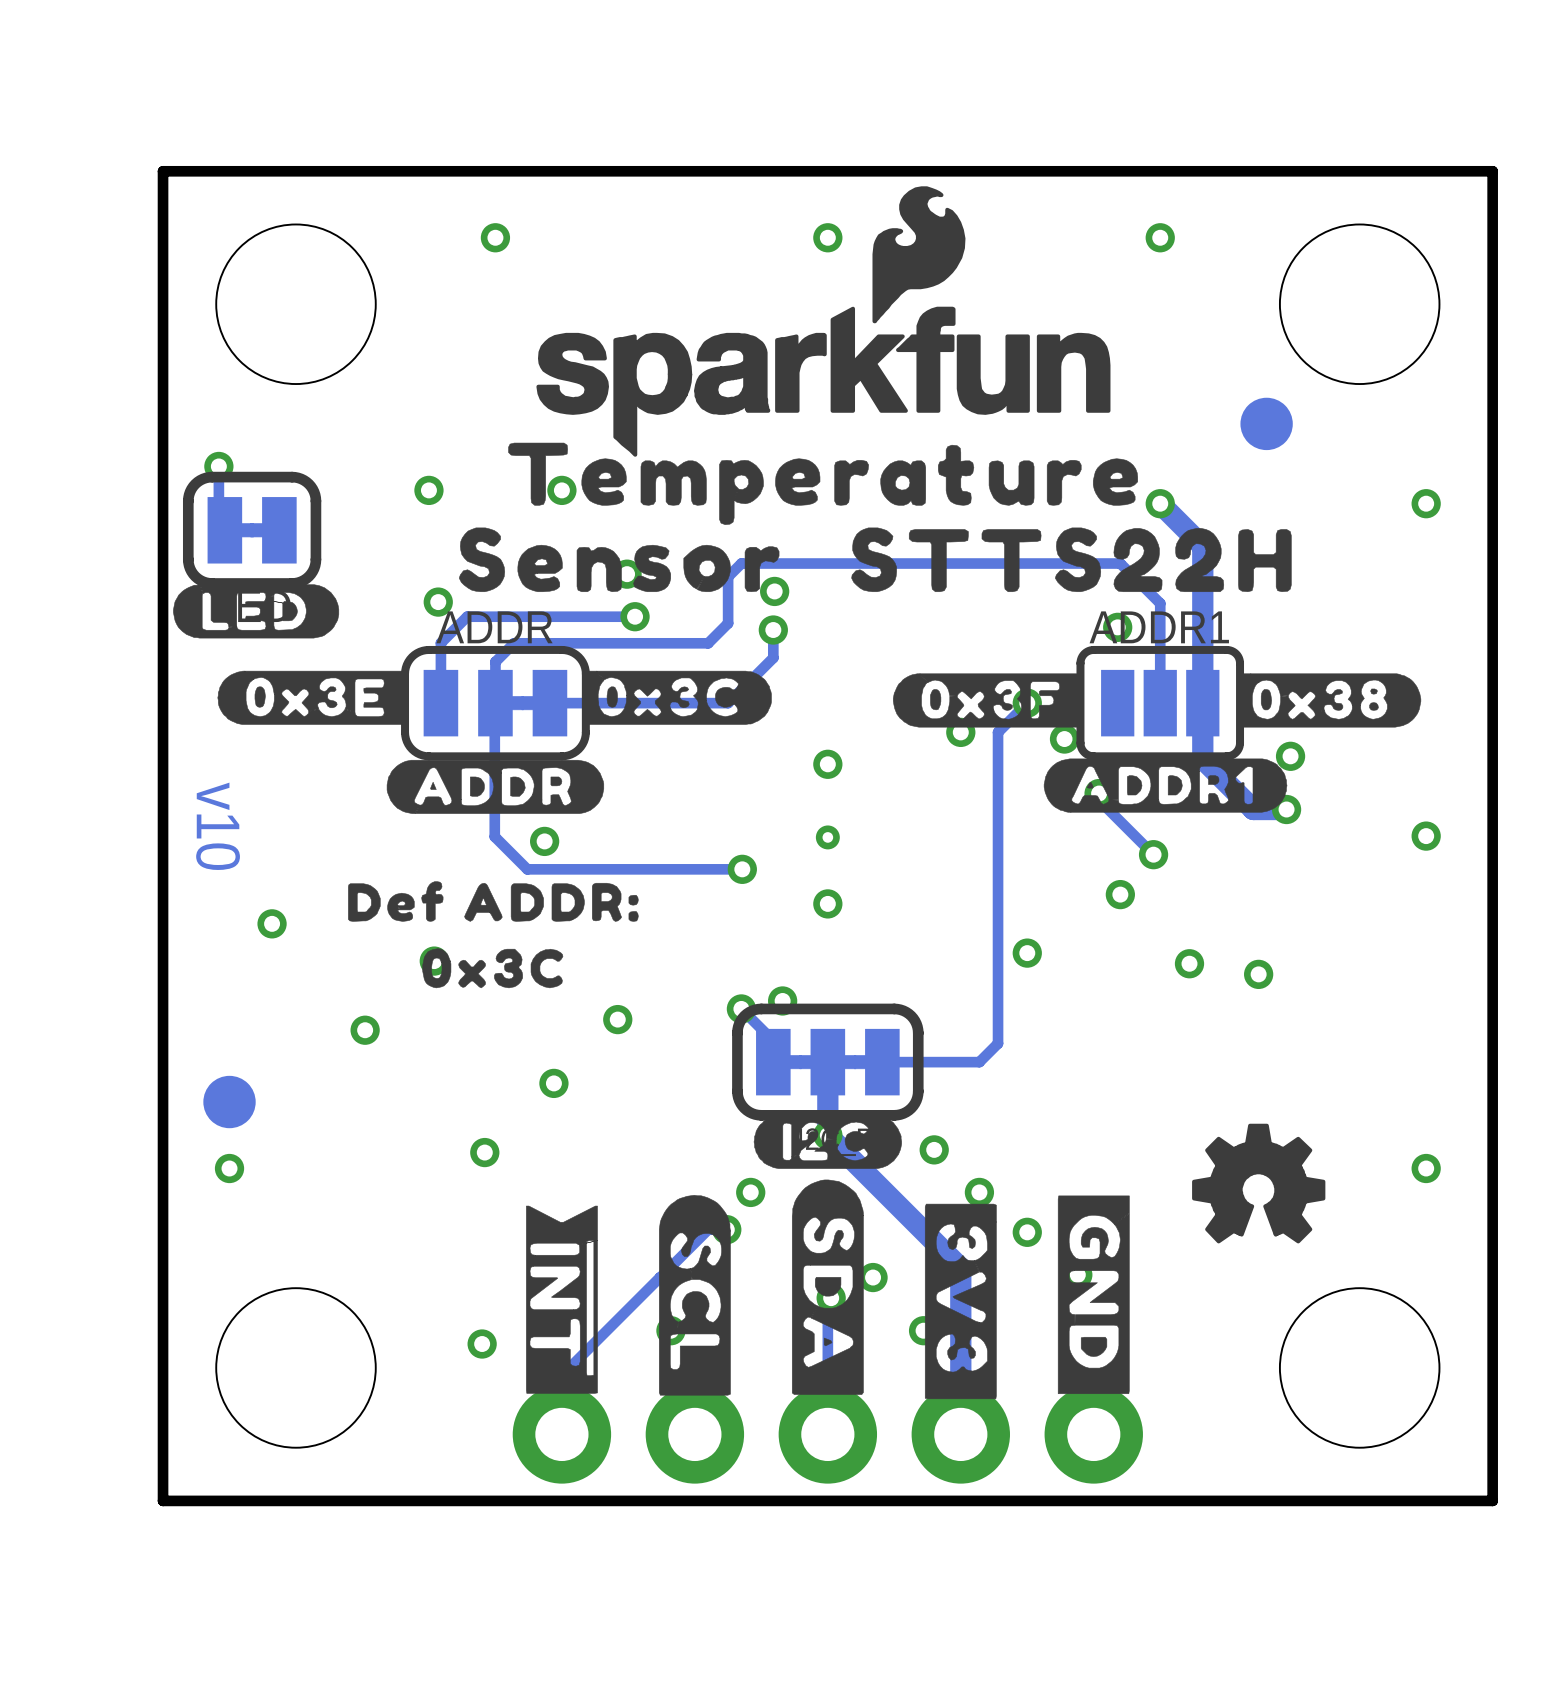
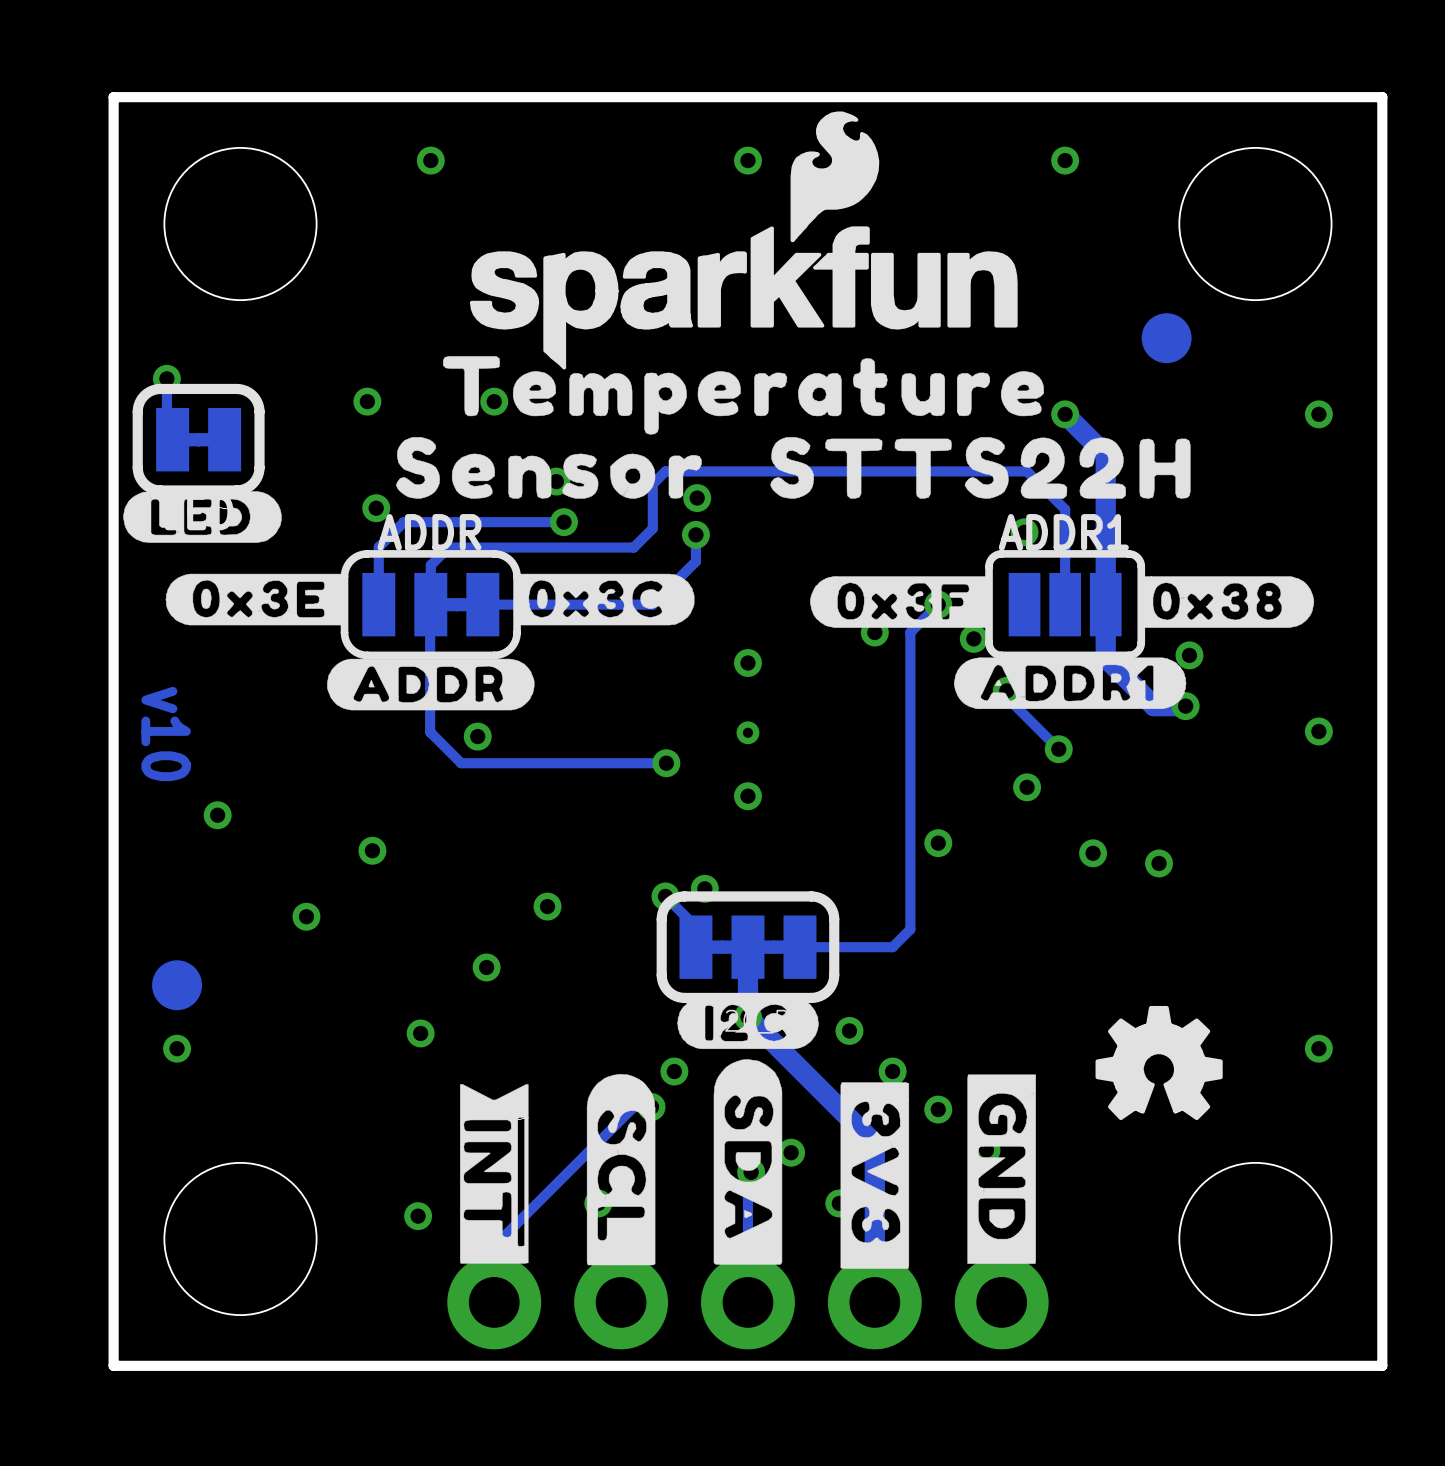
drawing: [348, 881, 639, 989] -> none

